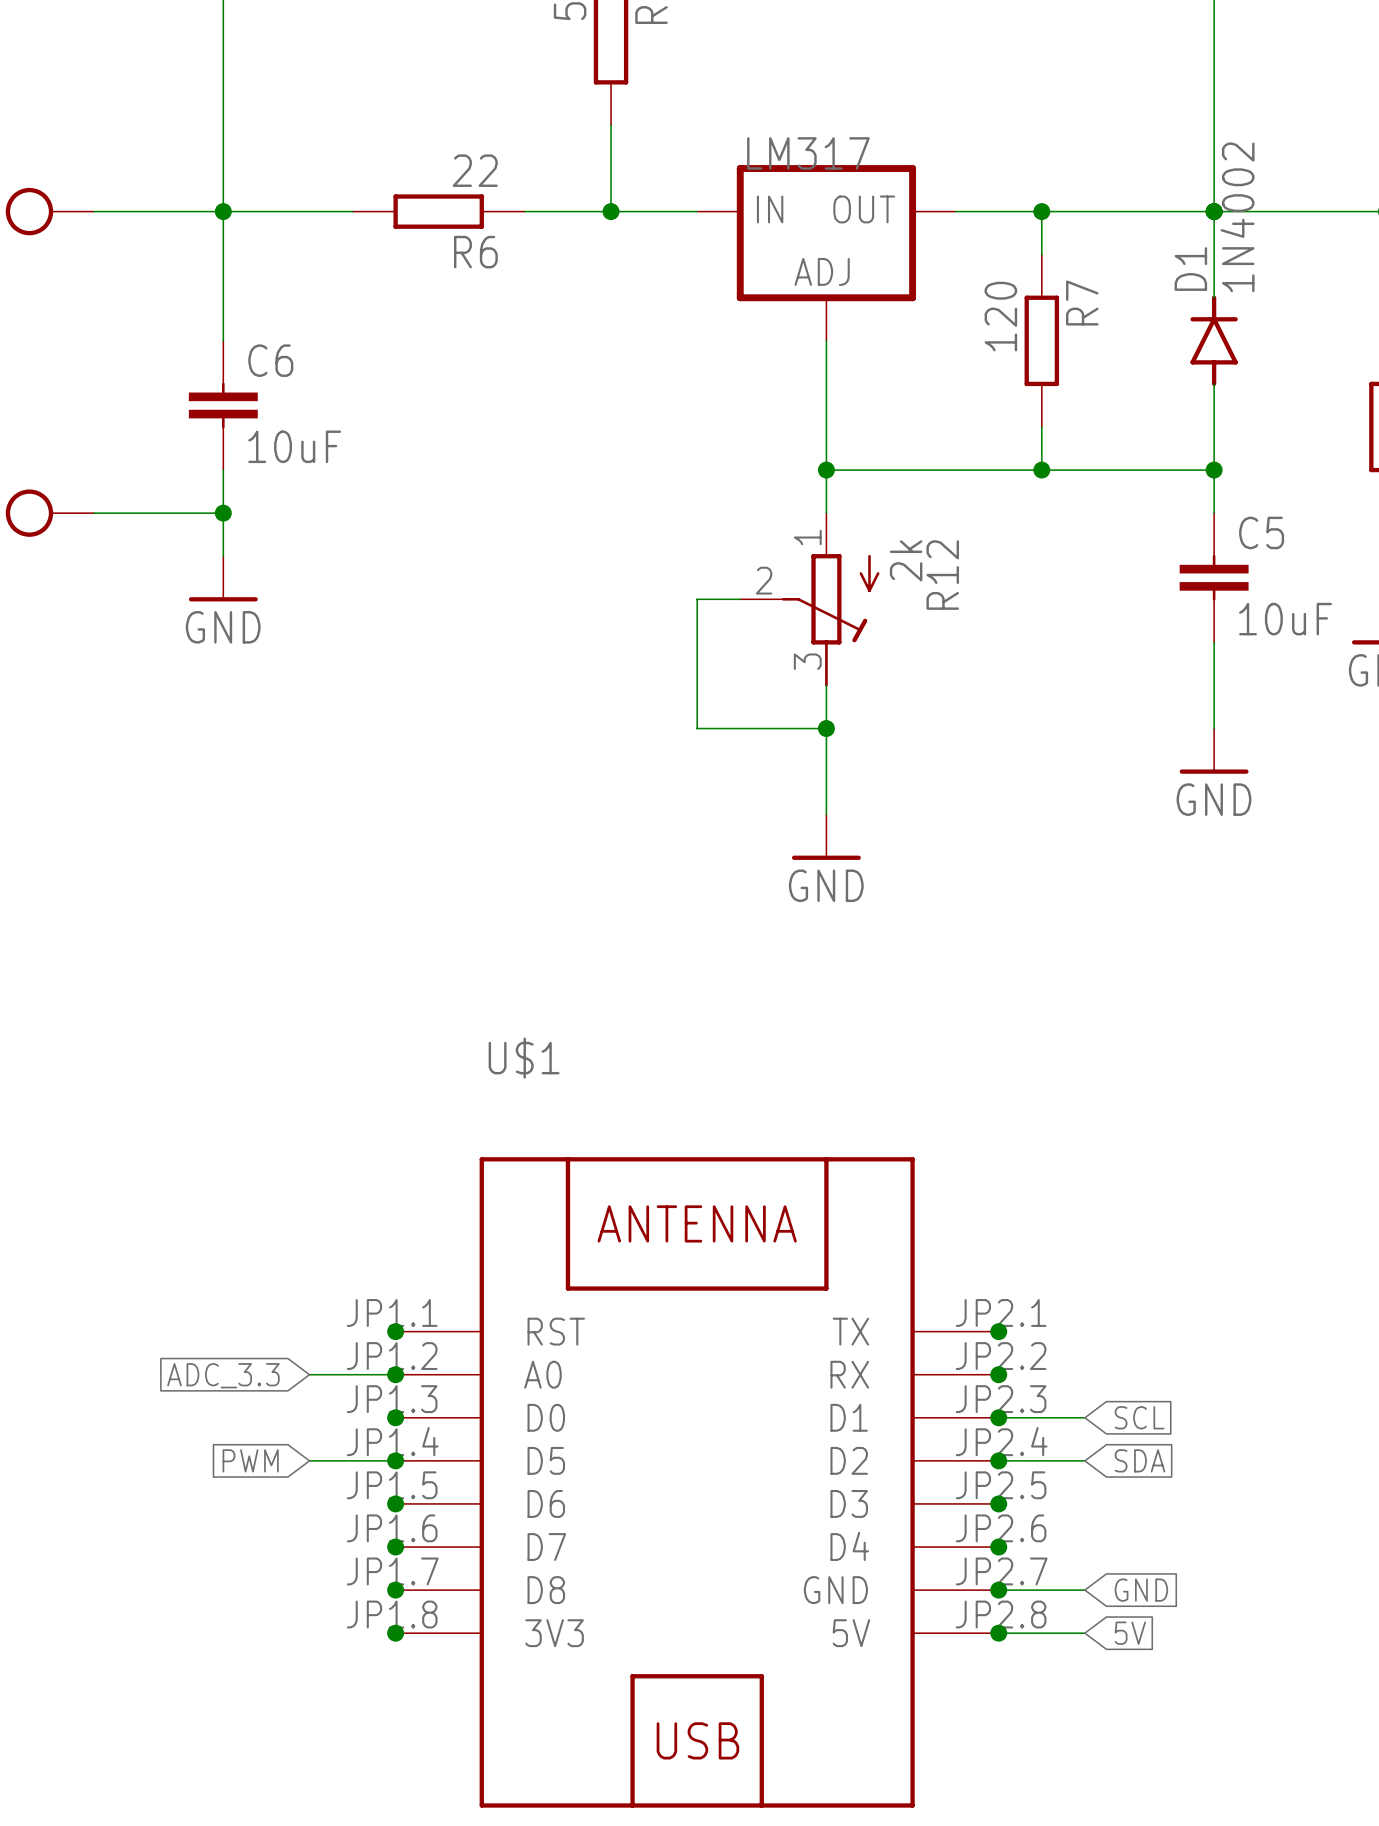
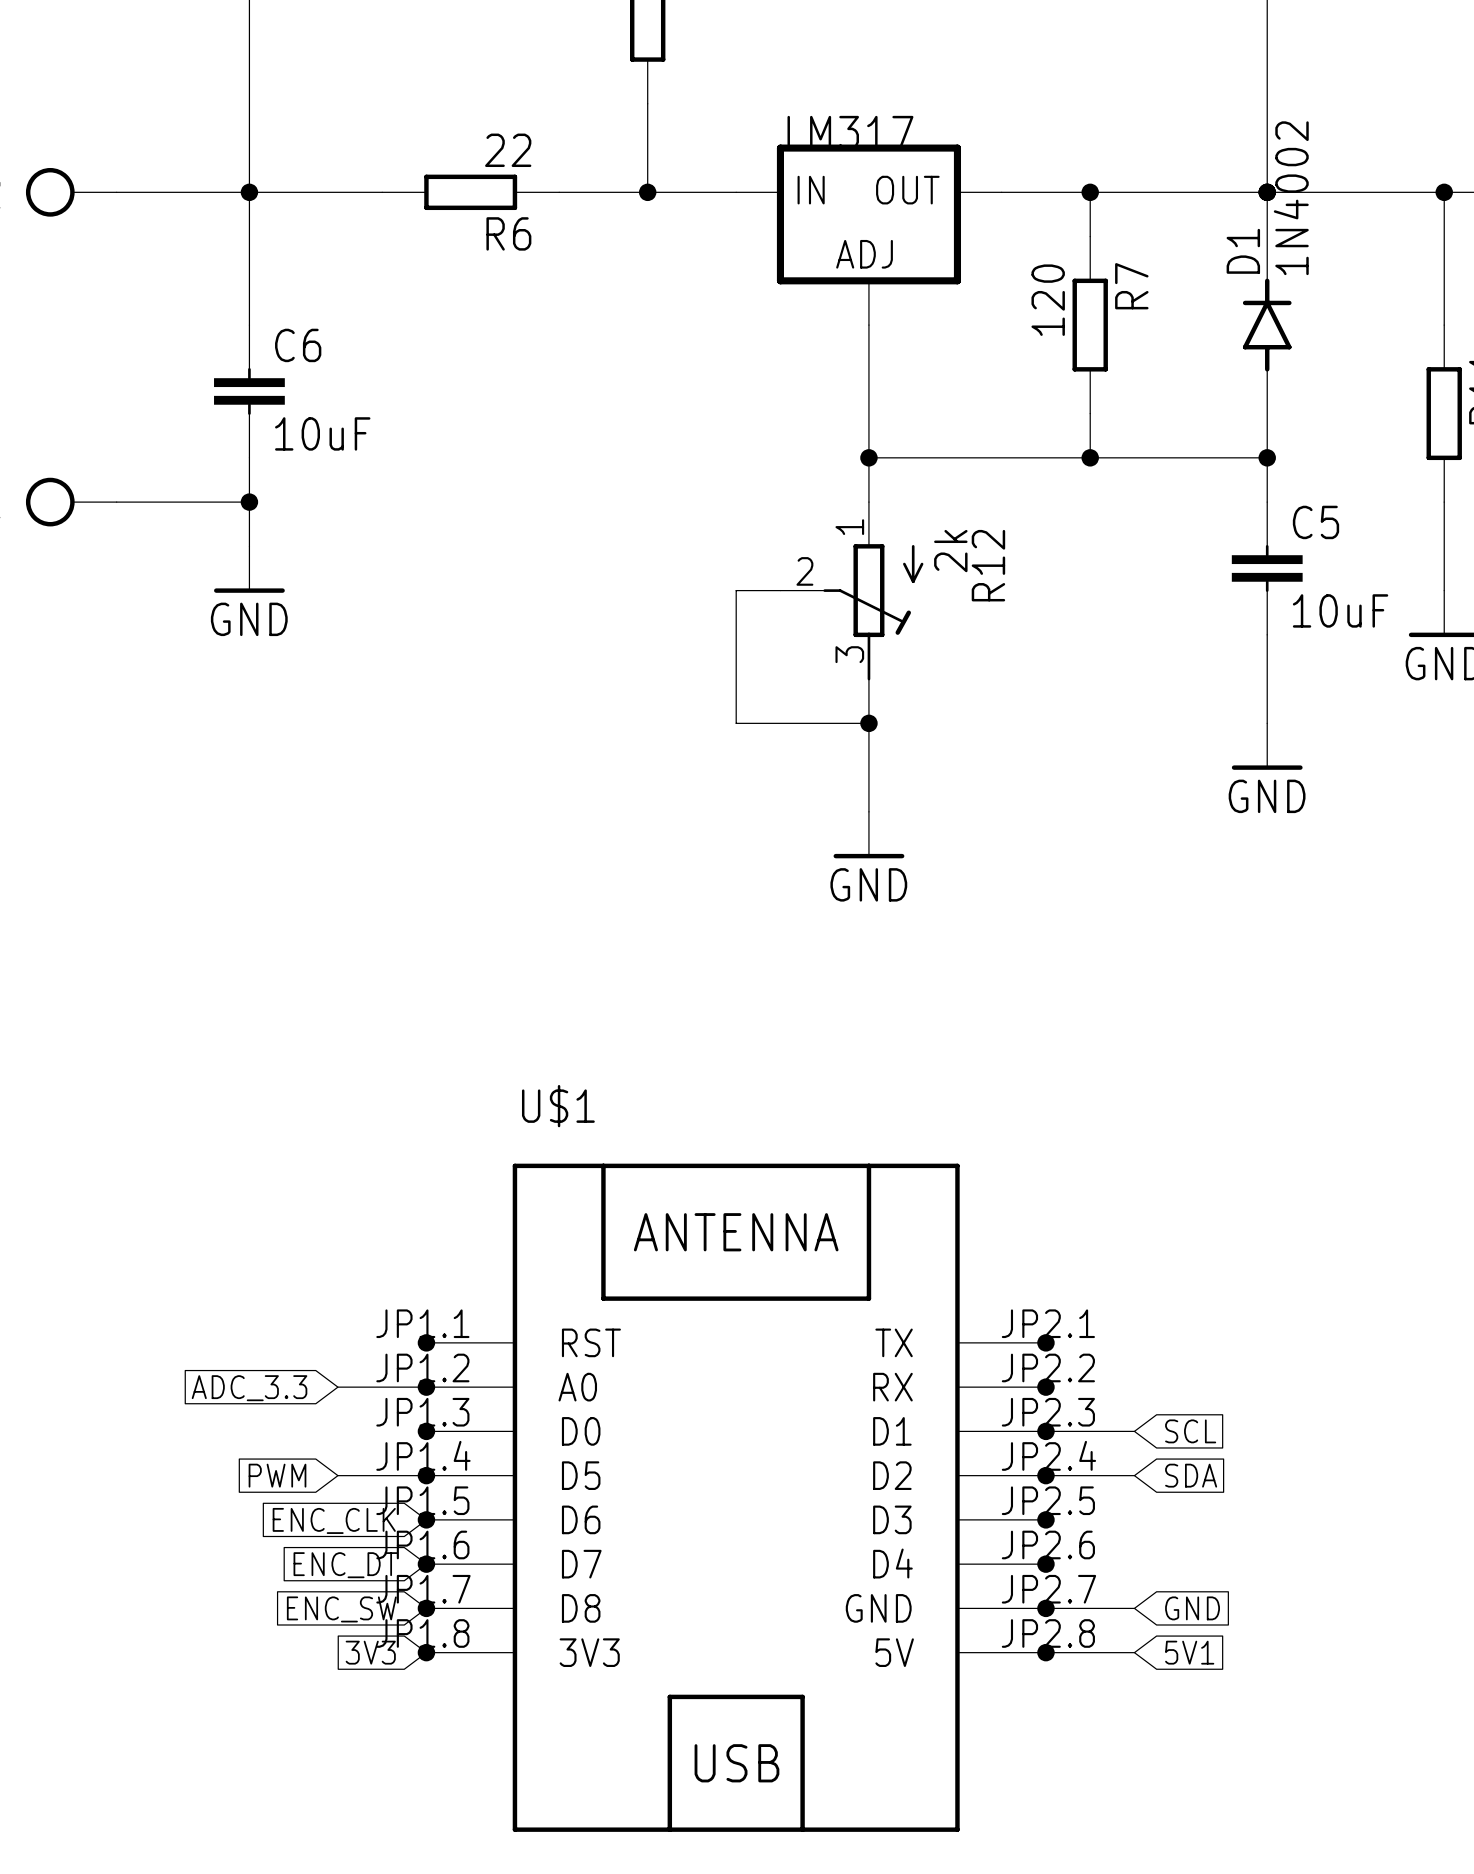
U$1 name position: U$1 (524, 1058) -> U$1 (558, 1106)
global label: none -> ENC_CLK (334, 1520)
global label: none -> ENC_DT (345, 1565)
global label: none -> ENC_SW (341, 1609)
global label: none -> 3V3 (370, 1652)
global label: 5V (1130, 1633) -> 5V1 (1189, 1652)

